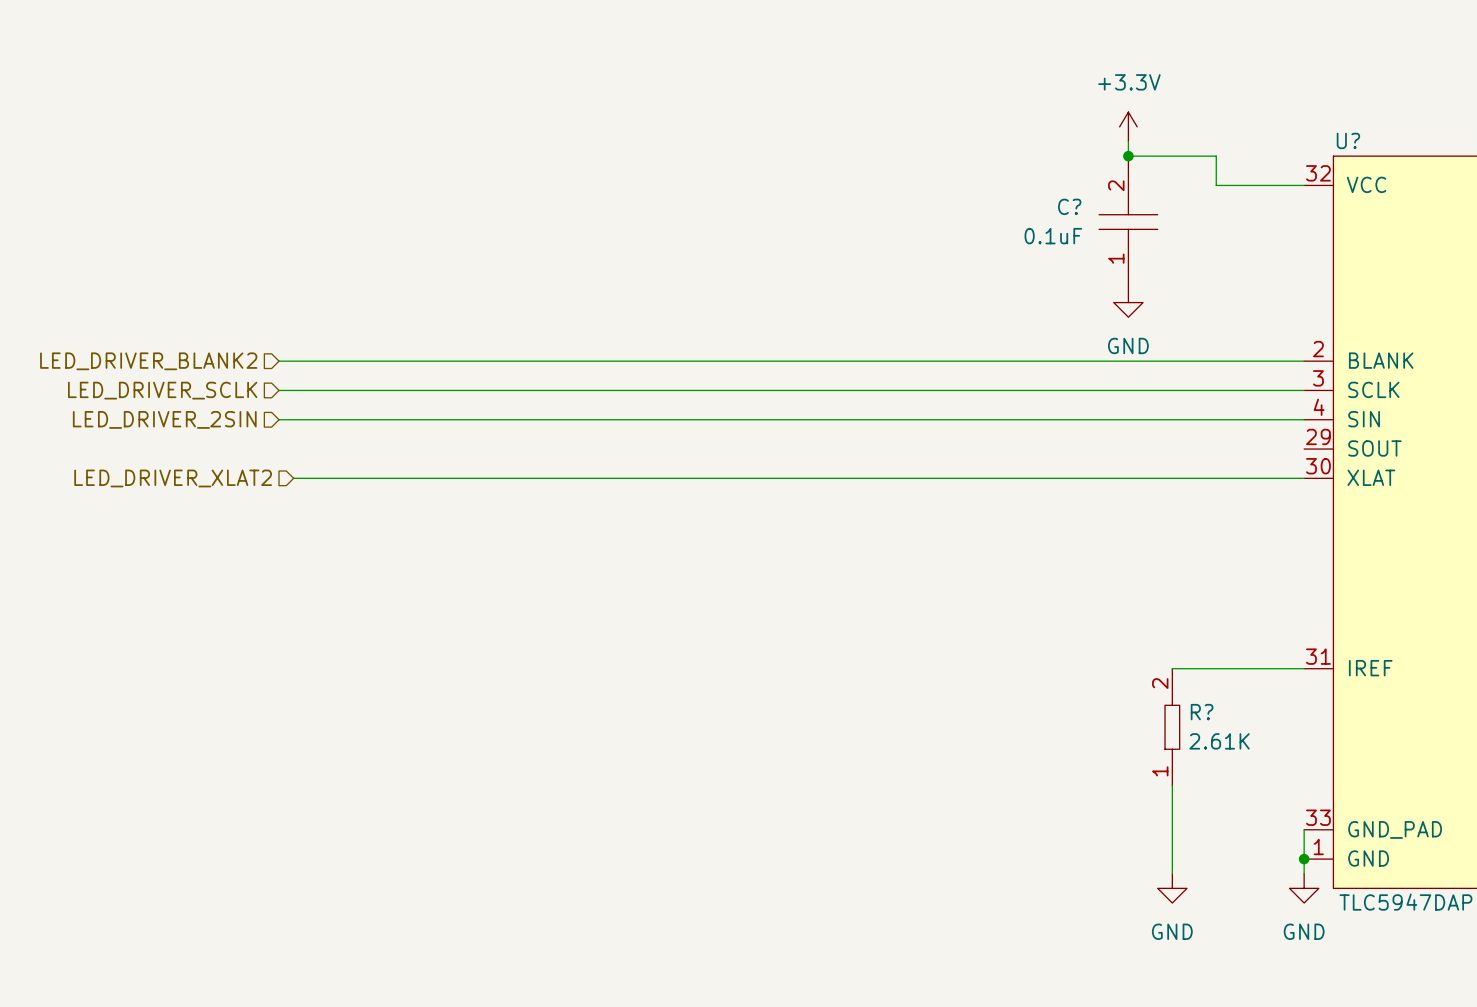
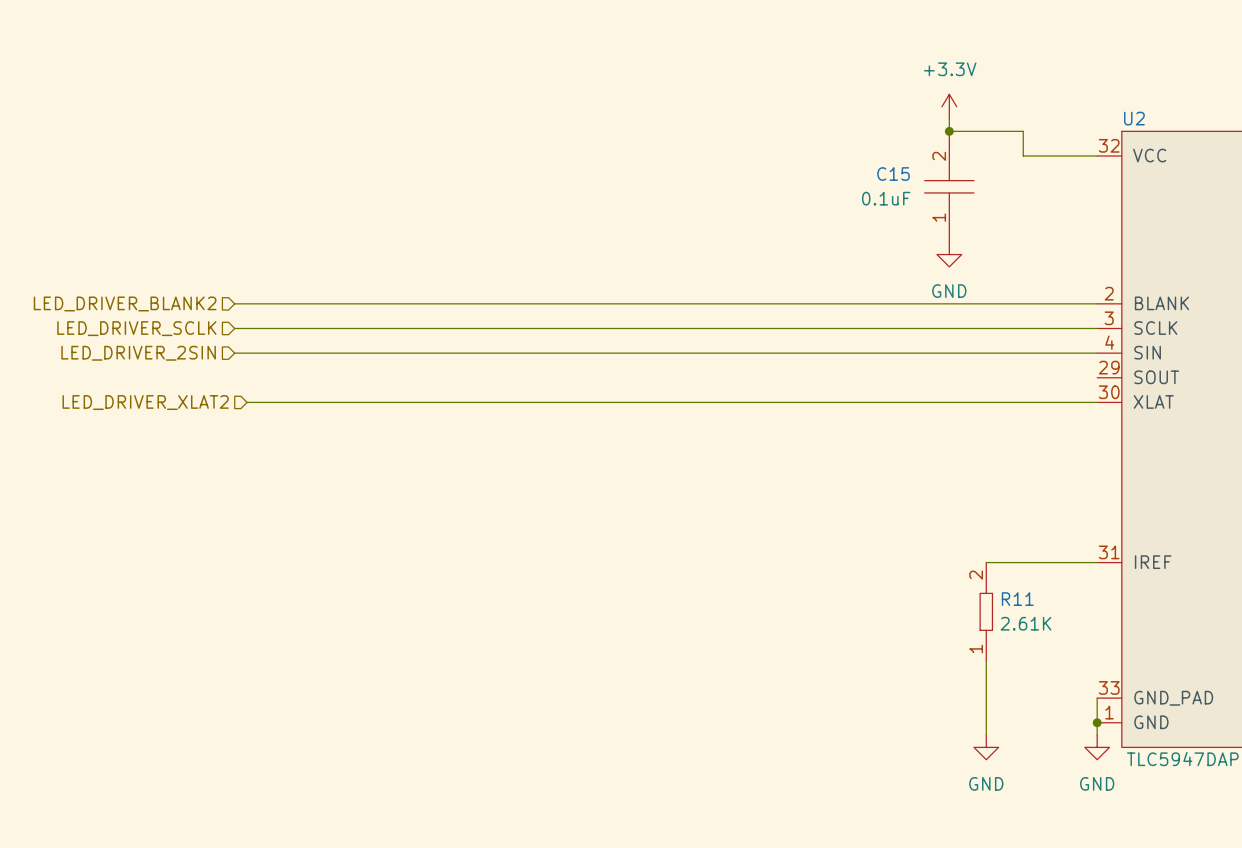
U? name: U? (1348, 140) -> U2 (1134, 118)
C? name: C? (1069, 206) -> C15 (893, 174)
R? name: R? (1202, 712) -> R11 (1017, 599)

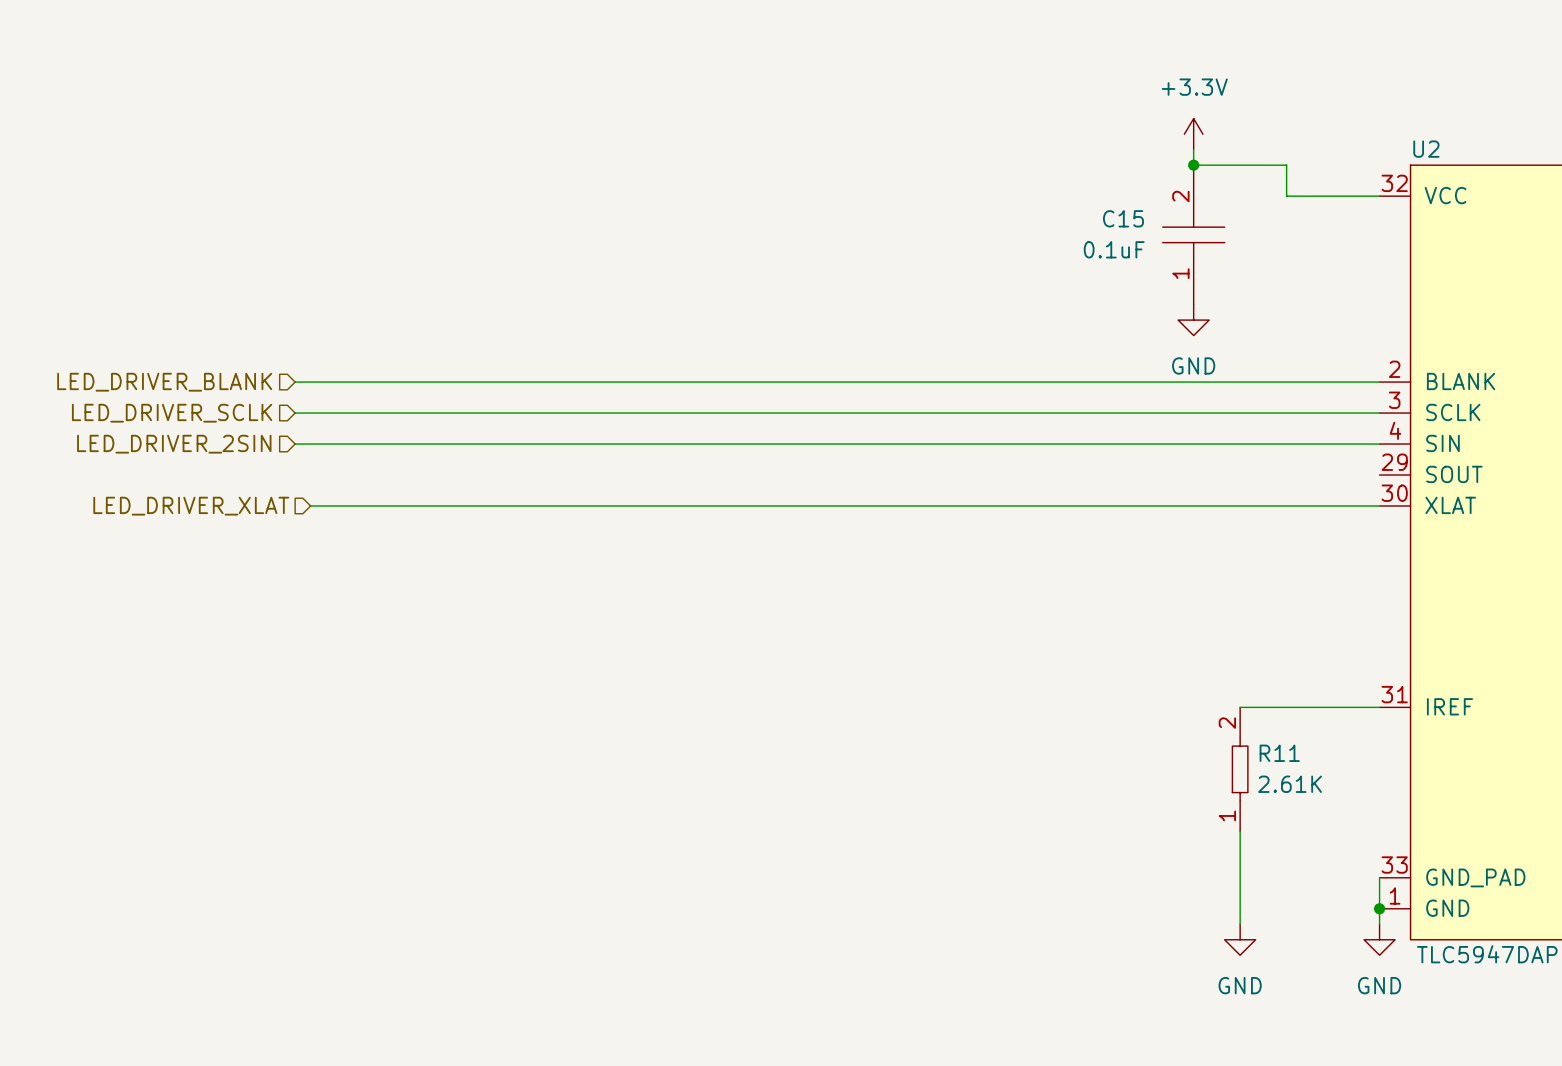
hierarchical label: LED_DRIVER_BLANK2 (125, 303) -> LED_DRIVER_BLANK (164, 382)
hierarchical label: LED_DRIVER_XLAT2 (145, 402) -> LED_DRIVER_XLAT (191, 506)

